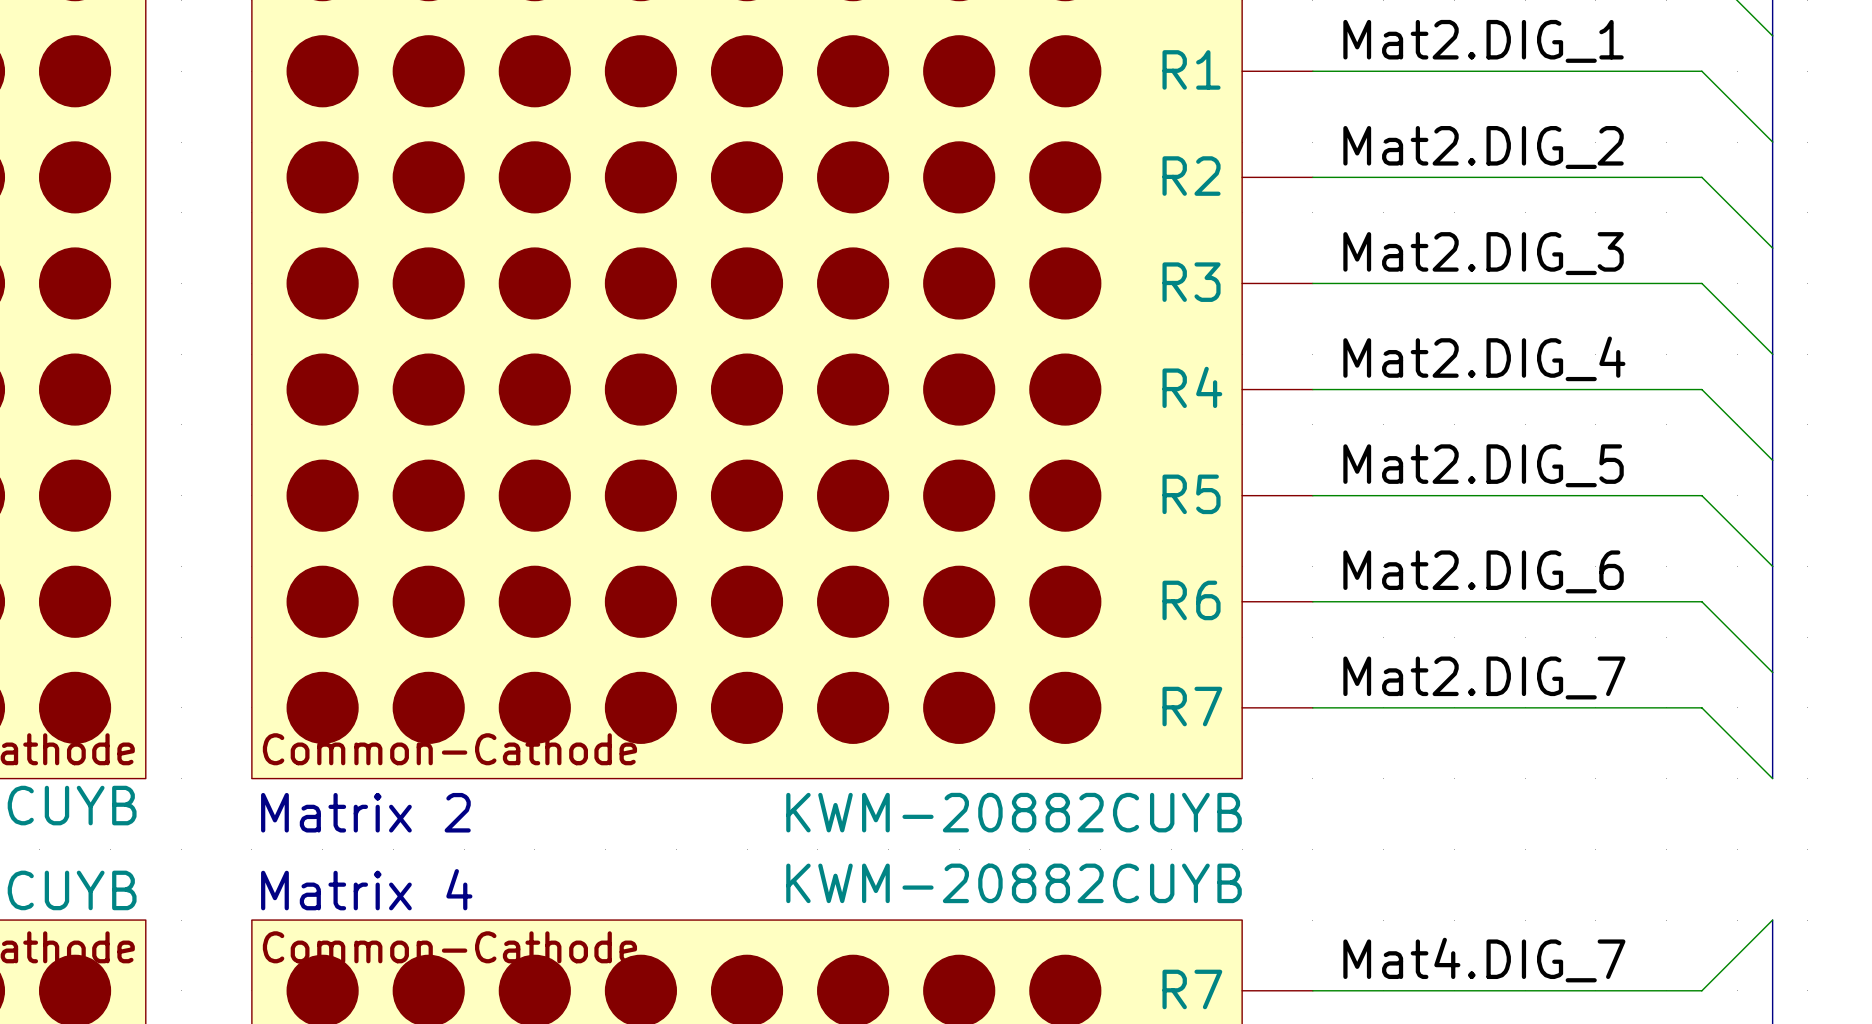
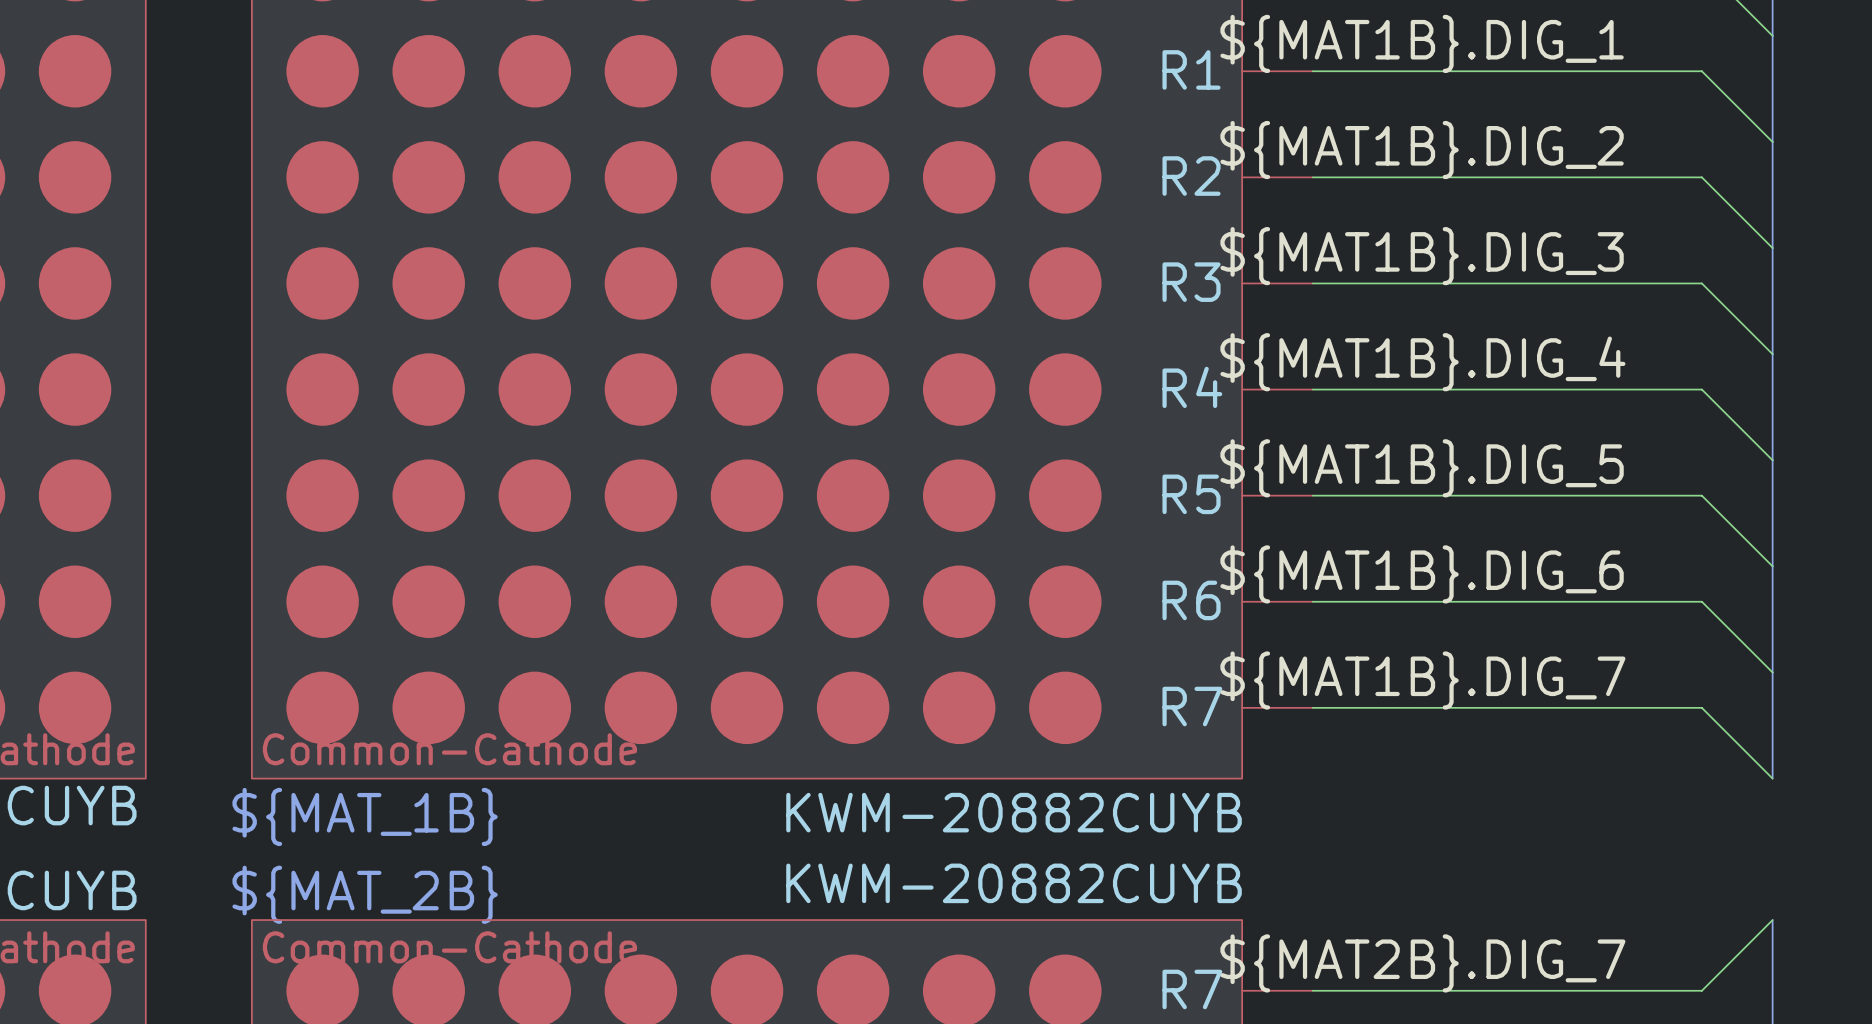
label: Mat2.DIG_1 (1483, 41) -> ${MAT1B}.DIG_1 (1422, 43)
label: Mat2.DIG_2 (1483, 147) -> ${MAT1B}.DIG_2 (1422, 150)
label: Mat2.DIG_3 (1483, 253) -> ${MAT1B}.DIG_3 (1422, 256)
label: Mat2.DIG_4 (1484, 358) -> ${MAT1B}.DIG_4 (1422, 362)
label: Mat2.DIG_5 (1483, 465) -> ${MAT1B}.DIG_5 (1422, 468)
label: Mat2.DIG_6 (1483, 571) -> ${MAT1B}.DIG_6 (1422, 574)
label: Mat2.DIG_7 (1484, 677) -> ${MAT1B}.DIG_7 (1422, 680)
text: Matrix 2 (365, 812) -> ${MAT_1B} (365, 816)
text: Matrix 4 (366, 889) -> ${MAT_2B} (365, 894)
label: Mat4.DIG_7 (1484, 960) -> ${MAT2B}.DIG_7 (1422, 963)

